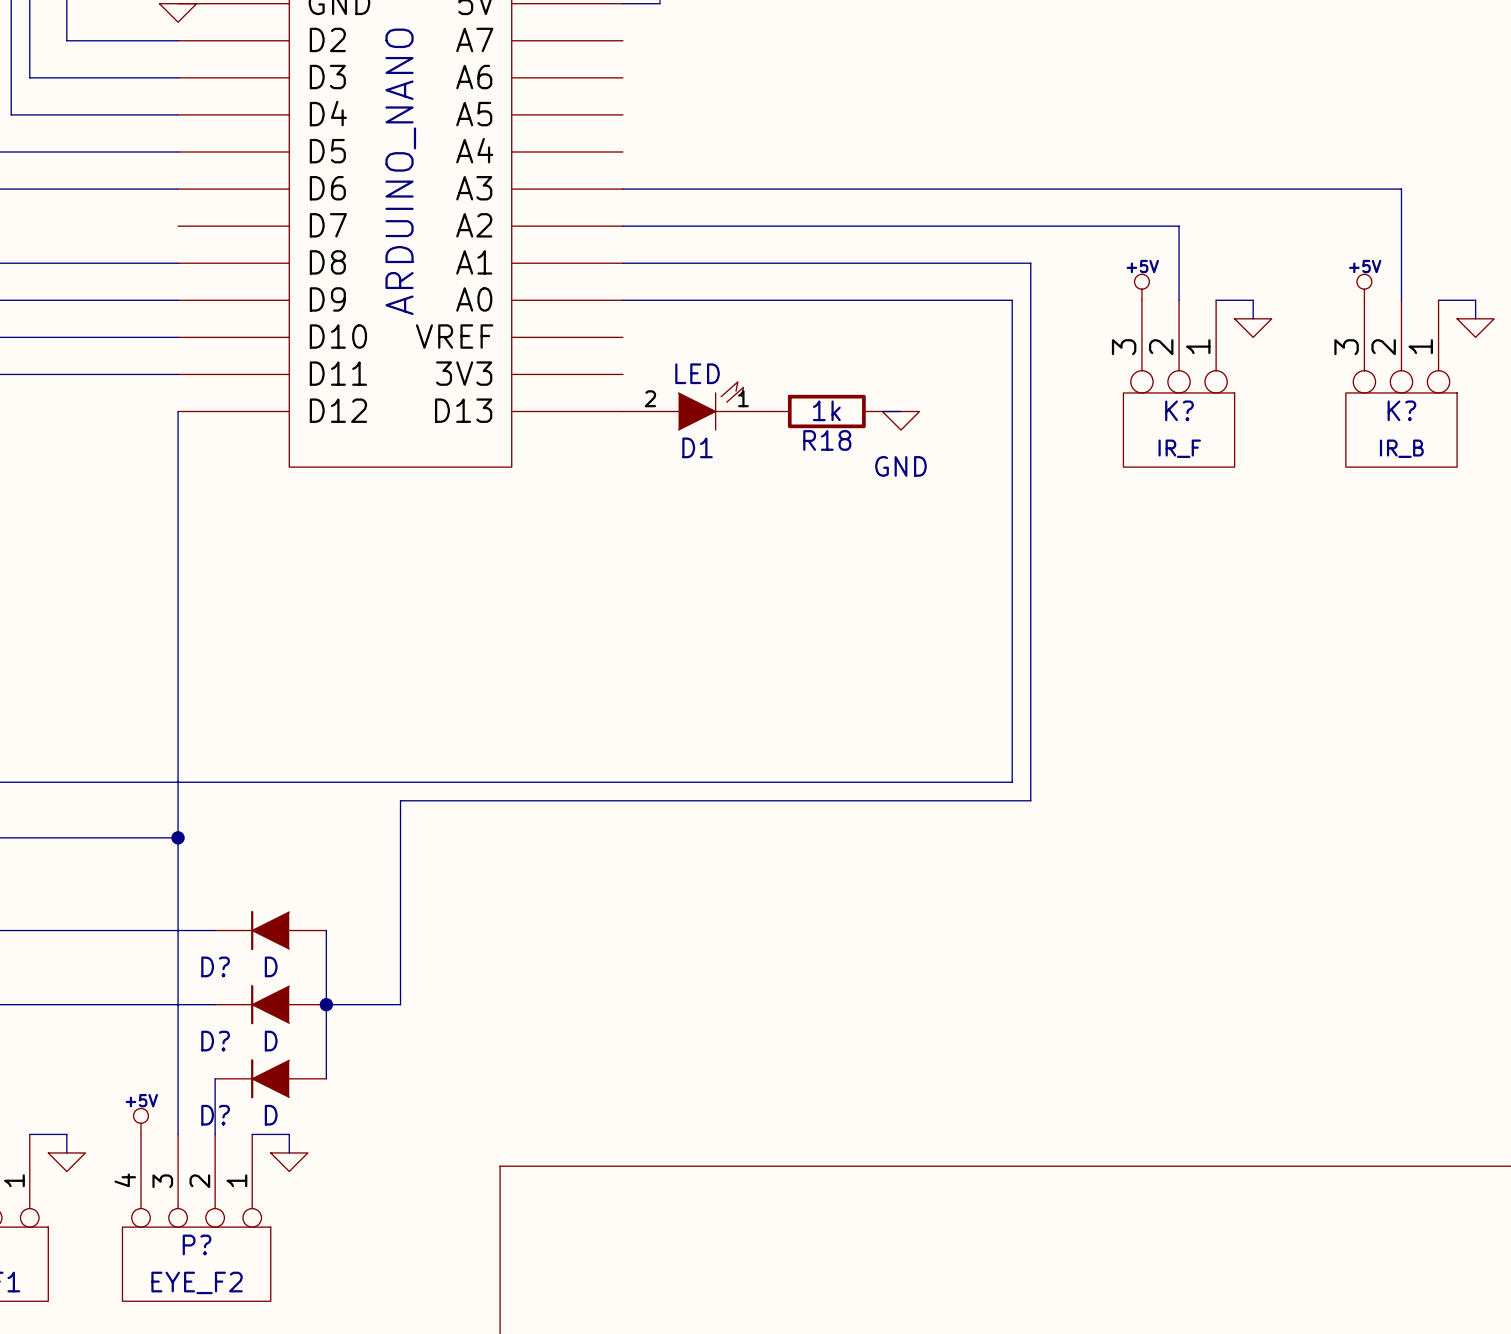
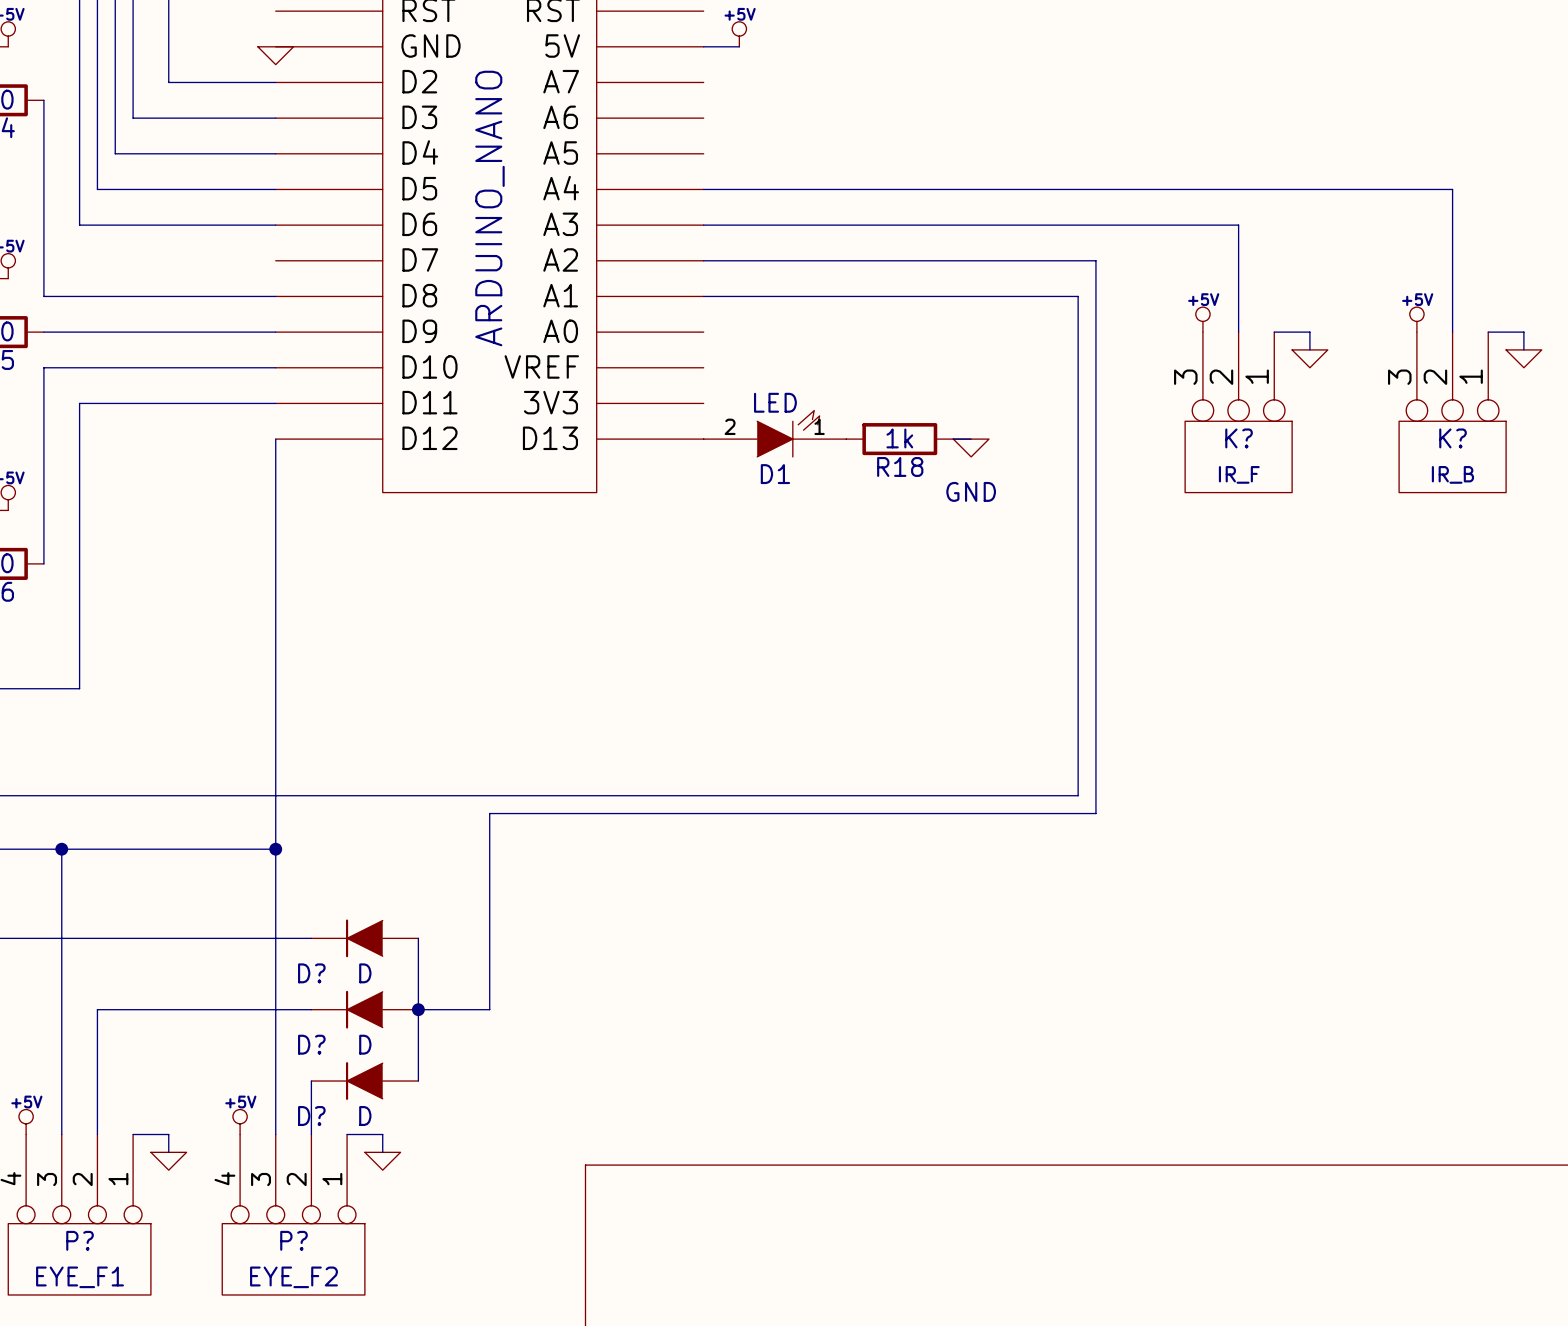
wire: (1179, 189) (1401, 189) -> (703, 189) (1452, 189) (1452, 225)
wire: (1030, 226) (1179, 226) -> (1238, 225) (1238, 260)
wire: (1012, 263) (1030, 263) -> (1095, 260) (1095, 296)
wire: (622, 300) (1012, 300) -> (1078, 296) (1078, 332)

